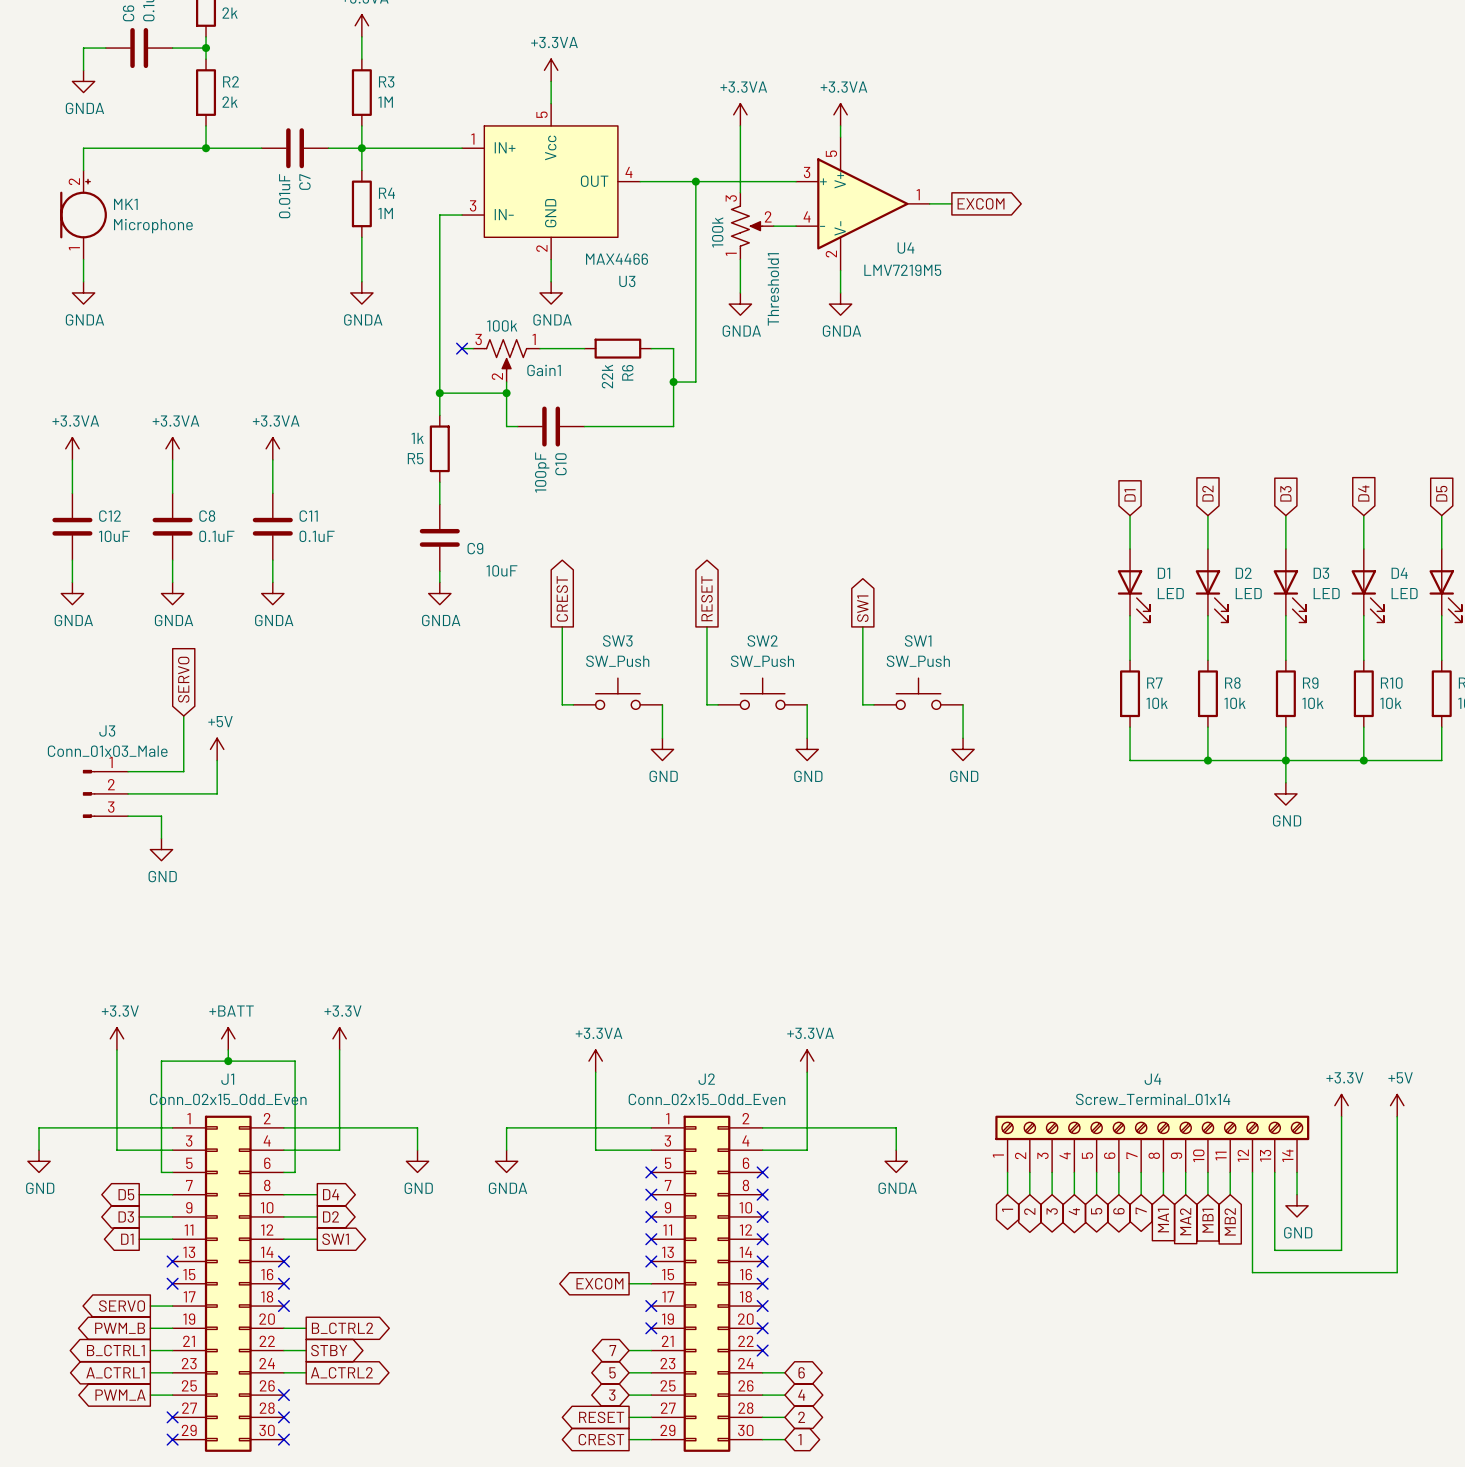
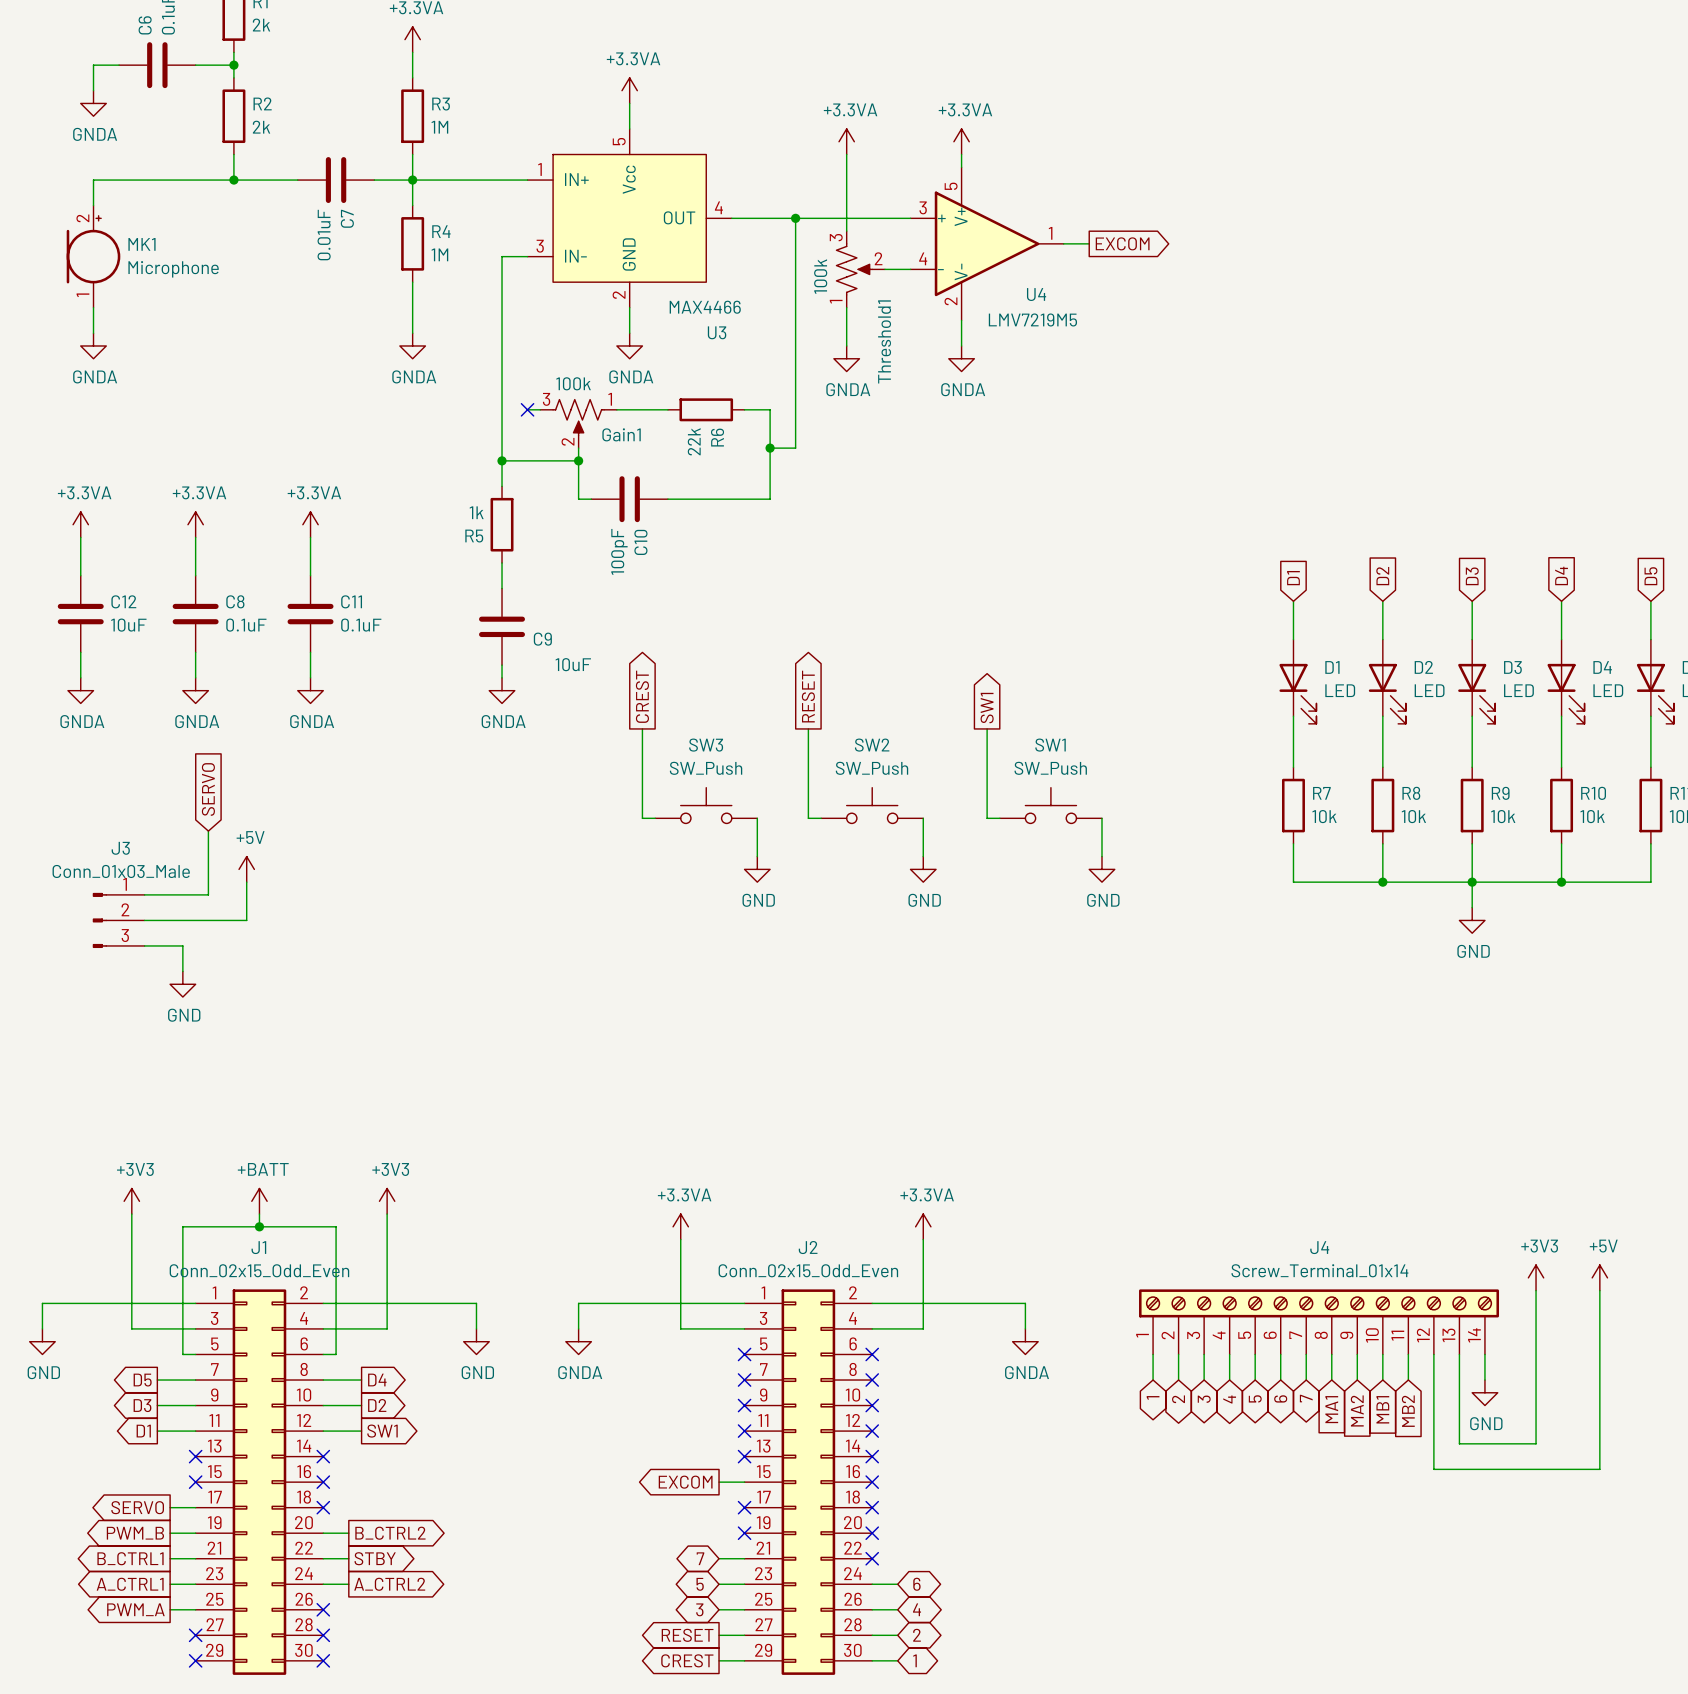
power symbol: +3.3V (116, 1038) -> +3V3 (131, 1201)
power symbol: +3.3V (339, 1038) -> +3V3 (387, 1201)
power symbol: +3.3V (1341, 1105) -> +3V3 (1536, 1277)

